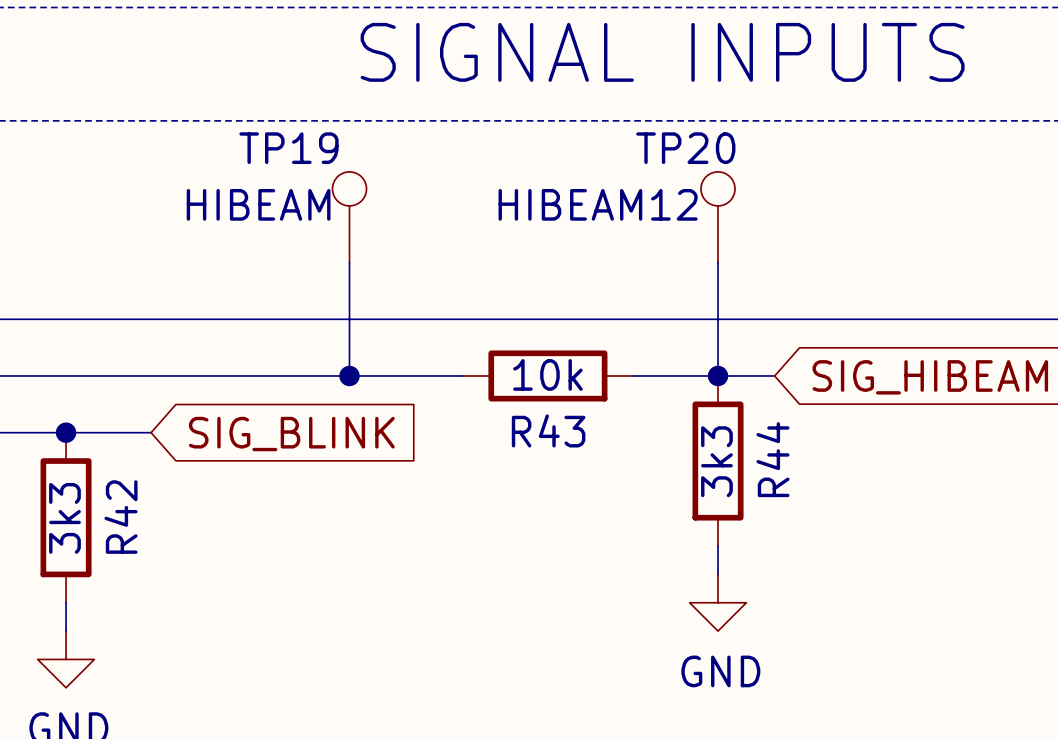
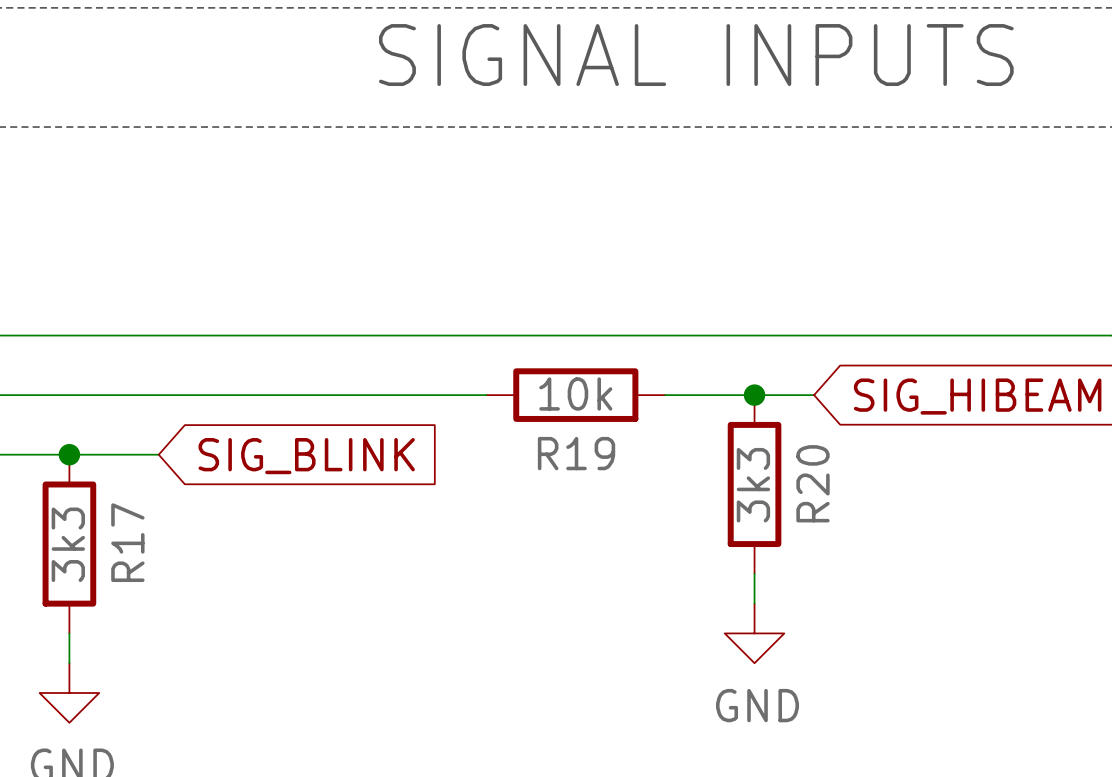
TP19: HIBEAM (349, 217) -> none
TP20: HIBEAM12 (718, 217) -> none
wire: (349, 262) (349, 375) -> none
wire: (718, 262) (718, 375) -> none
junction: (349, 375) -> none
R43 name: R43 (548, 430) -> R19 (576, 453)
R44 name: R44 (772, 459) -> R20 (813, 483)
R42 name: R42 (121, 517) -> R17 (127, 542)

